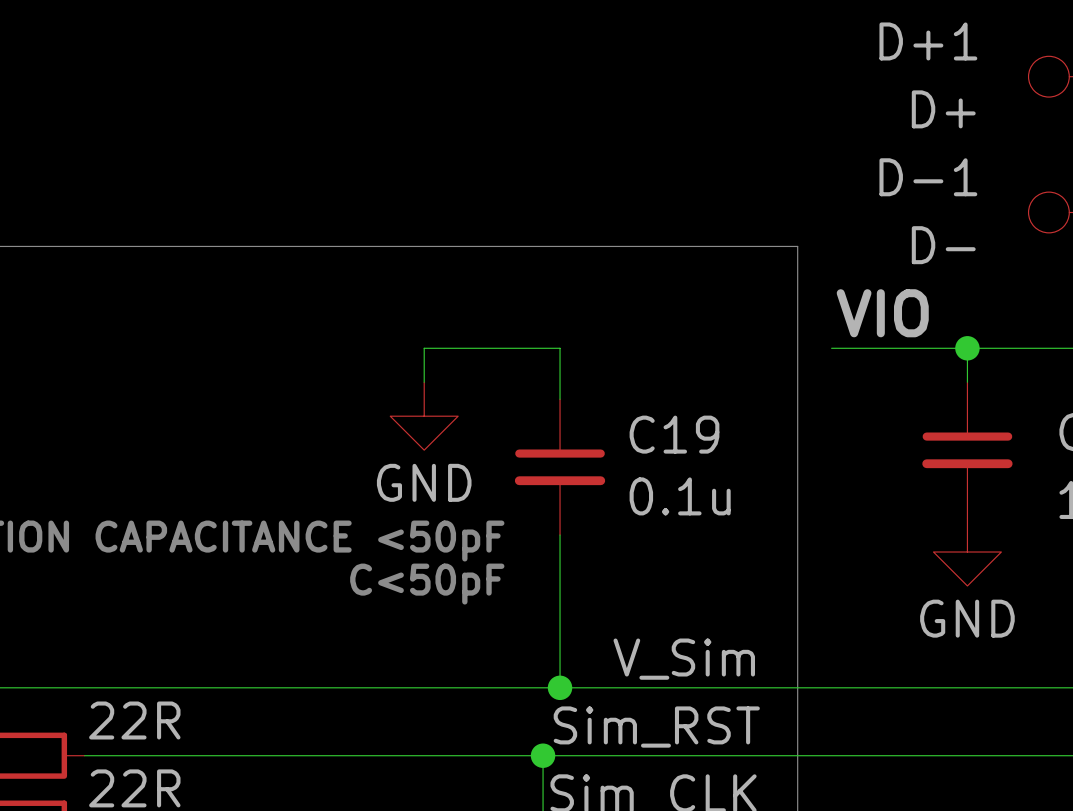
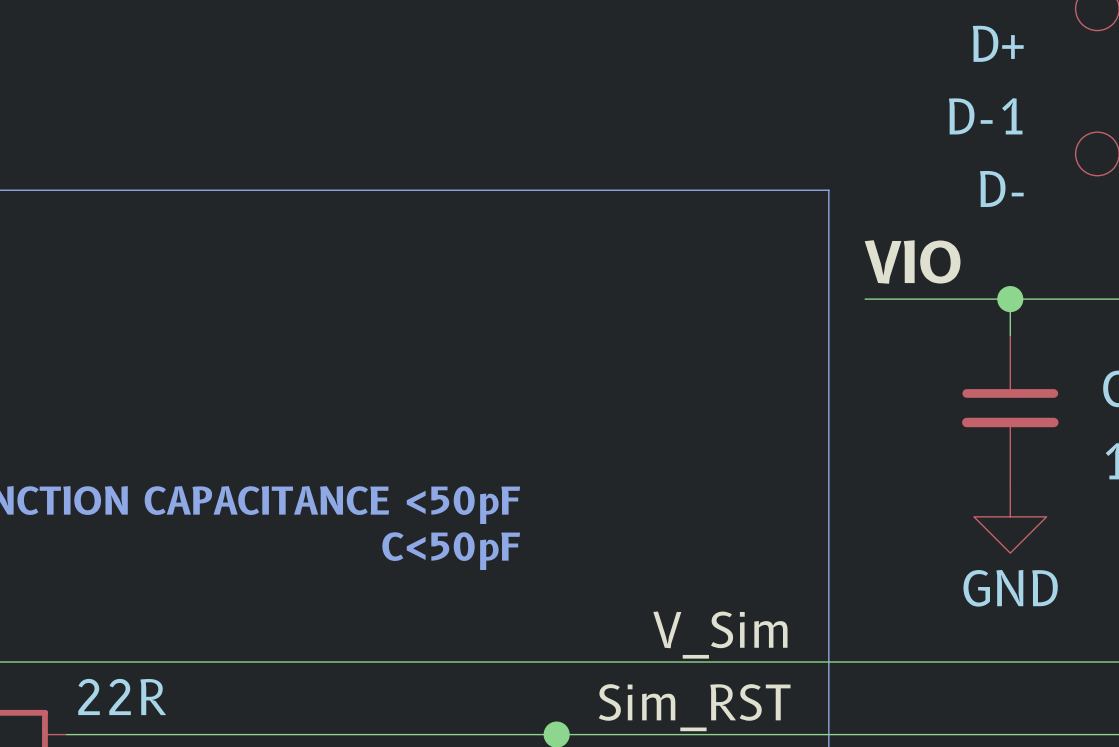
wire: (424, 382) (424, 348) (560, 348) (560, 399) -> none
power symbol: GND (424, 416) -> none
C19: 0.1u (560, 467) -> none
wire: (560, 535) (560, 687) -> none
junction: (560, 687) -> none

